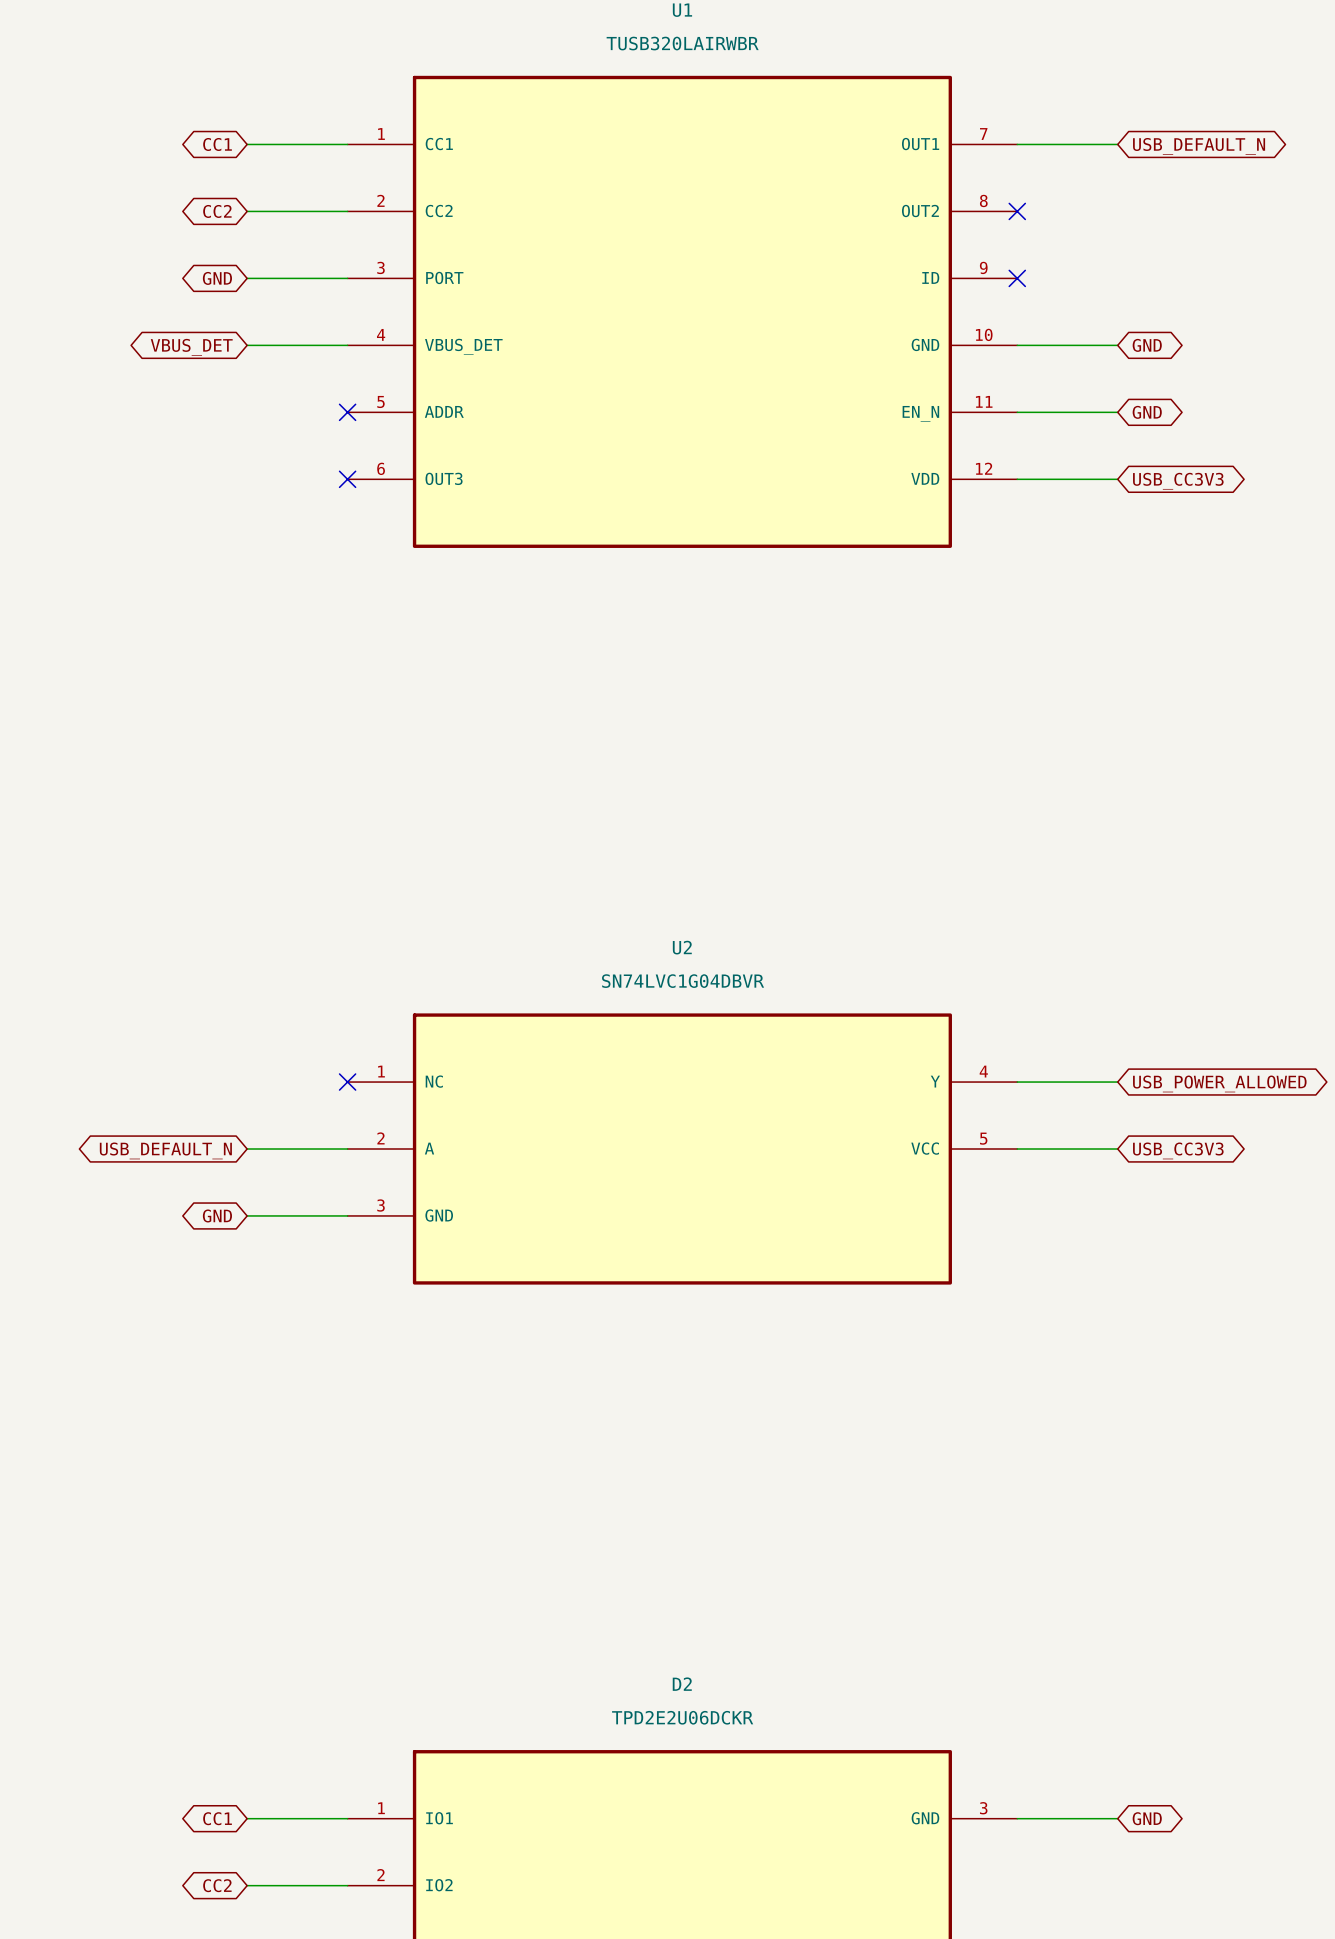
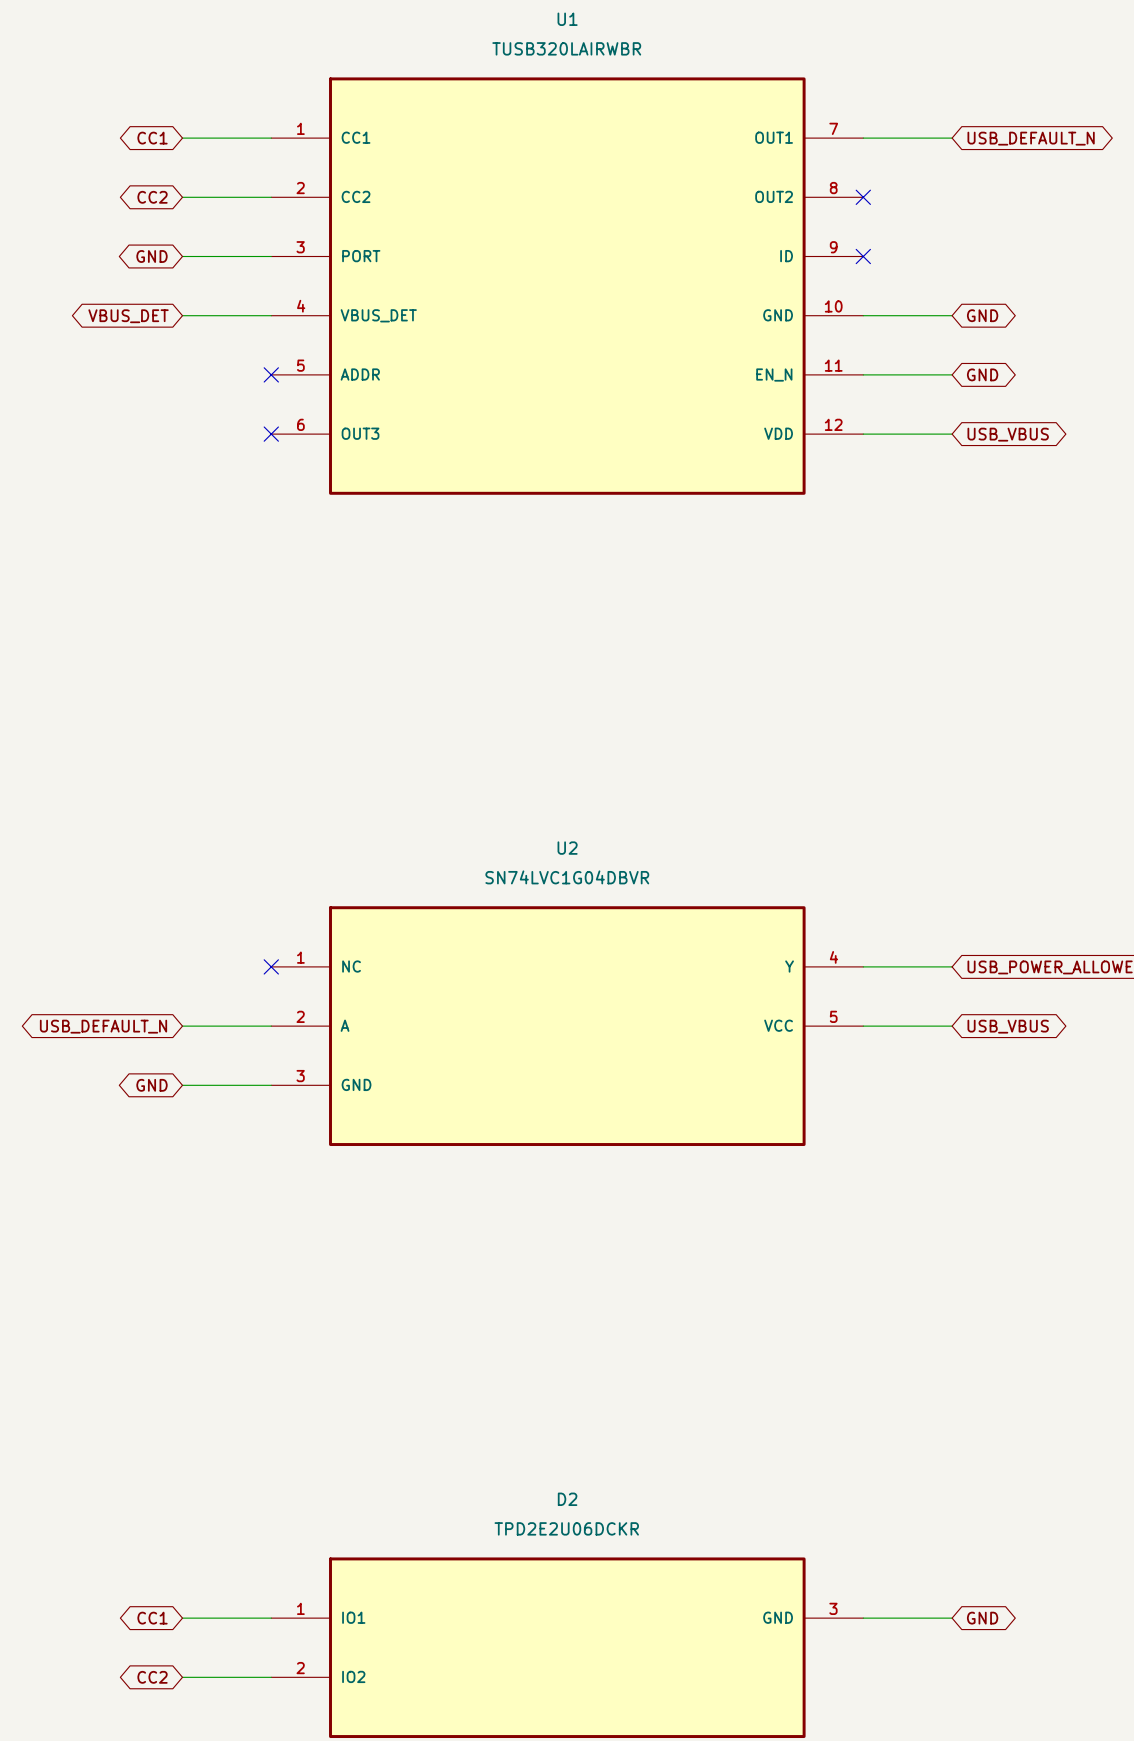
global label: USB_CC3V3 (1178, 481) -> USB_VBUS (1008, 434)
global label: USB_CC3V3 (1178, 1150) -> USB_VBUS (1008, 1026)

